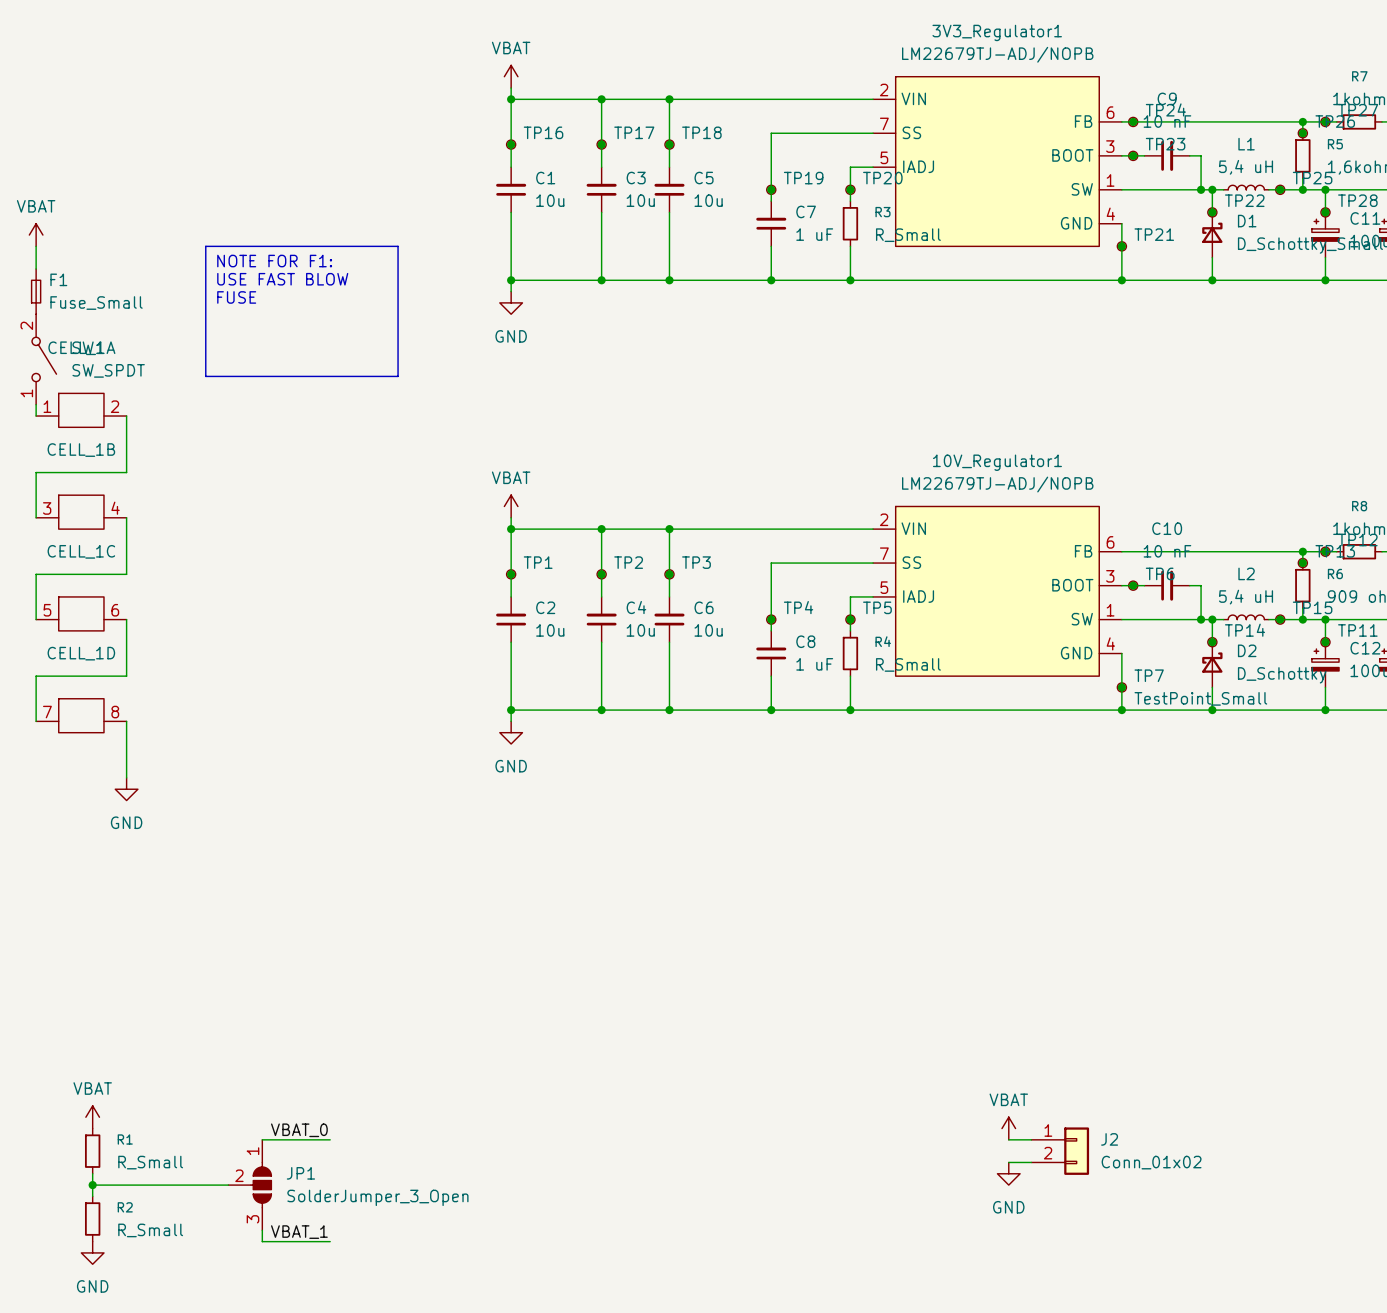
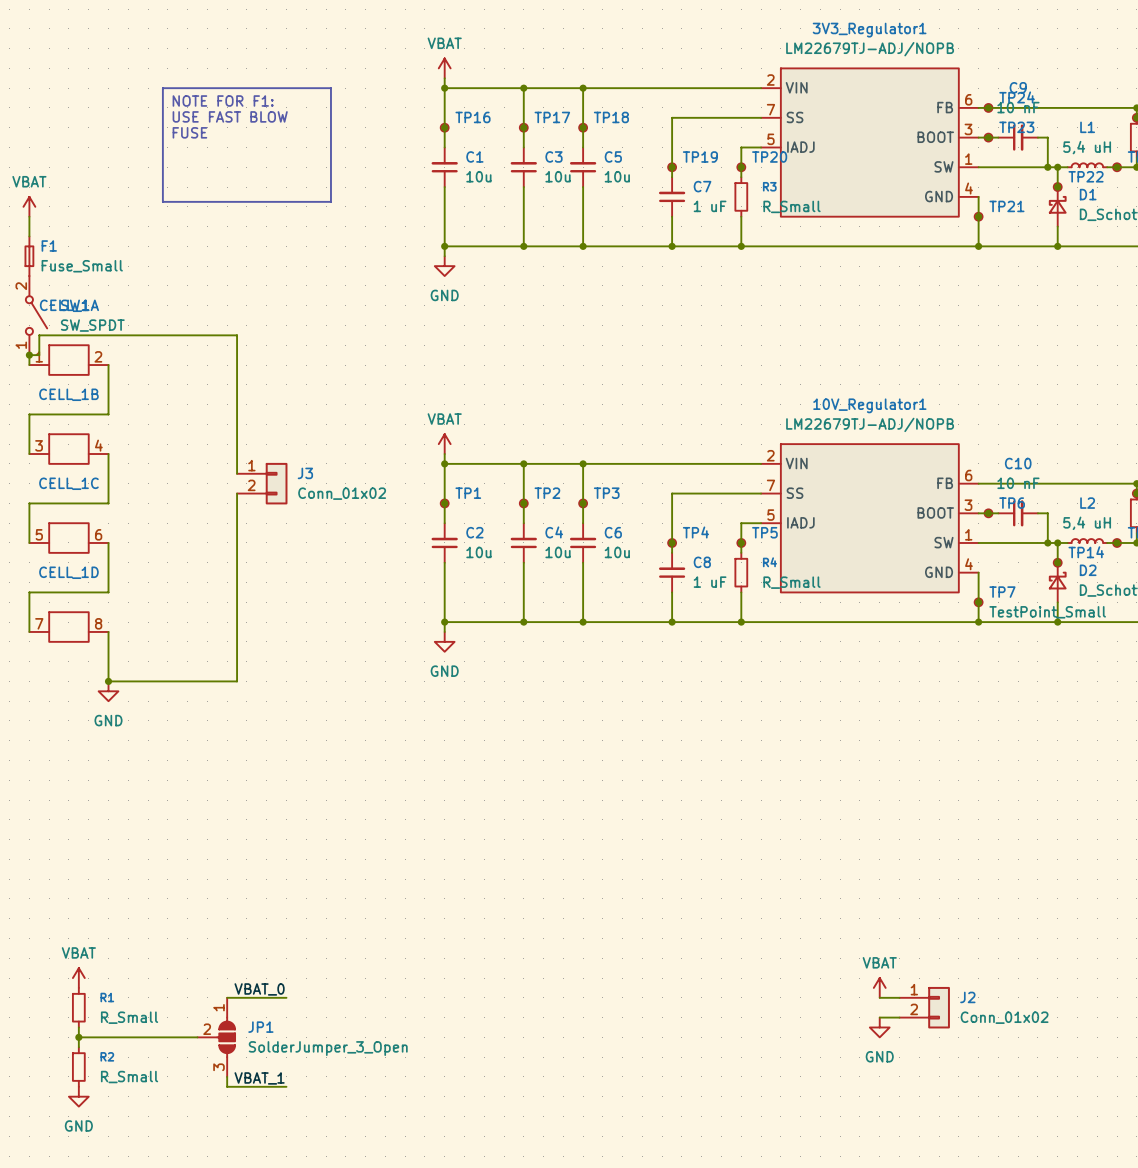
line: (205, 246) (398, 246) (398, 376) (205, 376) (205, 246) -> (162, 88) (330, 88) (330, 201) (162, 201) (162, 88)
text position: NOTE FOR F1: (274, 261) -> NOTE FOR F1: (223, 100)
text position: USE FAST BLOW (282, 279) -> USE FAST BLOW (230, 116)
text position: FUSE (236, 297) -> FUSE (189, 132)
wire: none -> (29, 355) (39, 355) (39, 335) (237, 335) (237, 473)
junction: none -> (29, 355)
J3: none -> Conn_01x02 (262, 483)
wire: none -> (237, 493) (237, 681) (108, 681)
junction: none -> (108, 681)

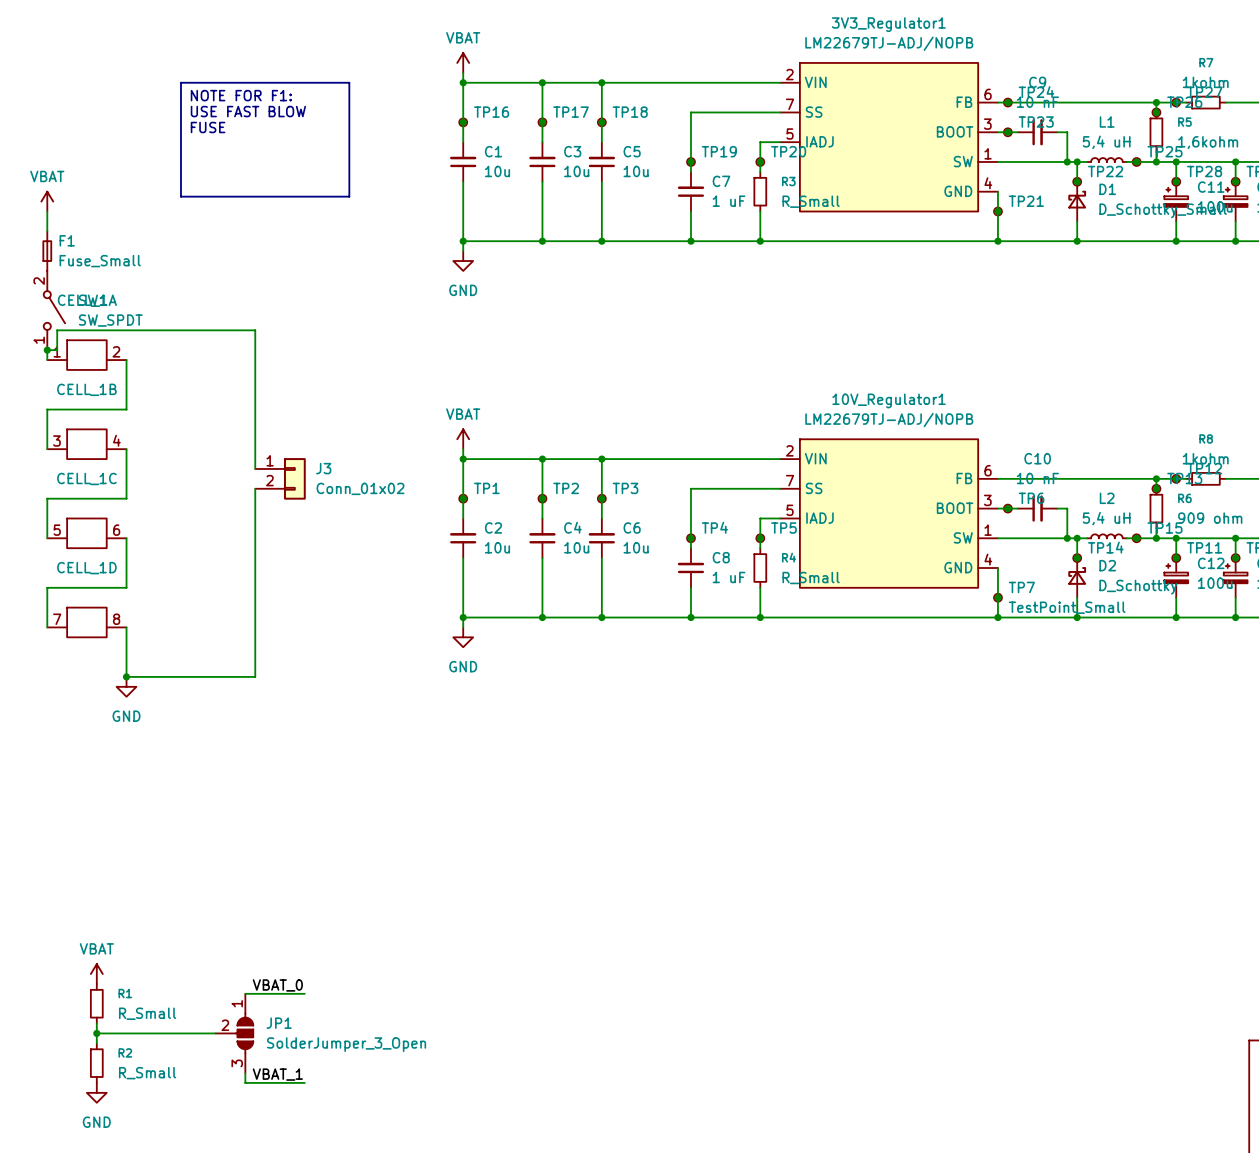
power symbol: VBAT (879, 987) -> none
wire: (879, 997) (899, 997) -> none
J2: Conn_01x02 (924, 1007) -> none
wire: (879, 1017) (899, 1017) -> none
power symbol: GND (879, 1027) -> none

